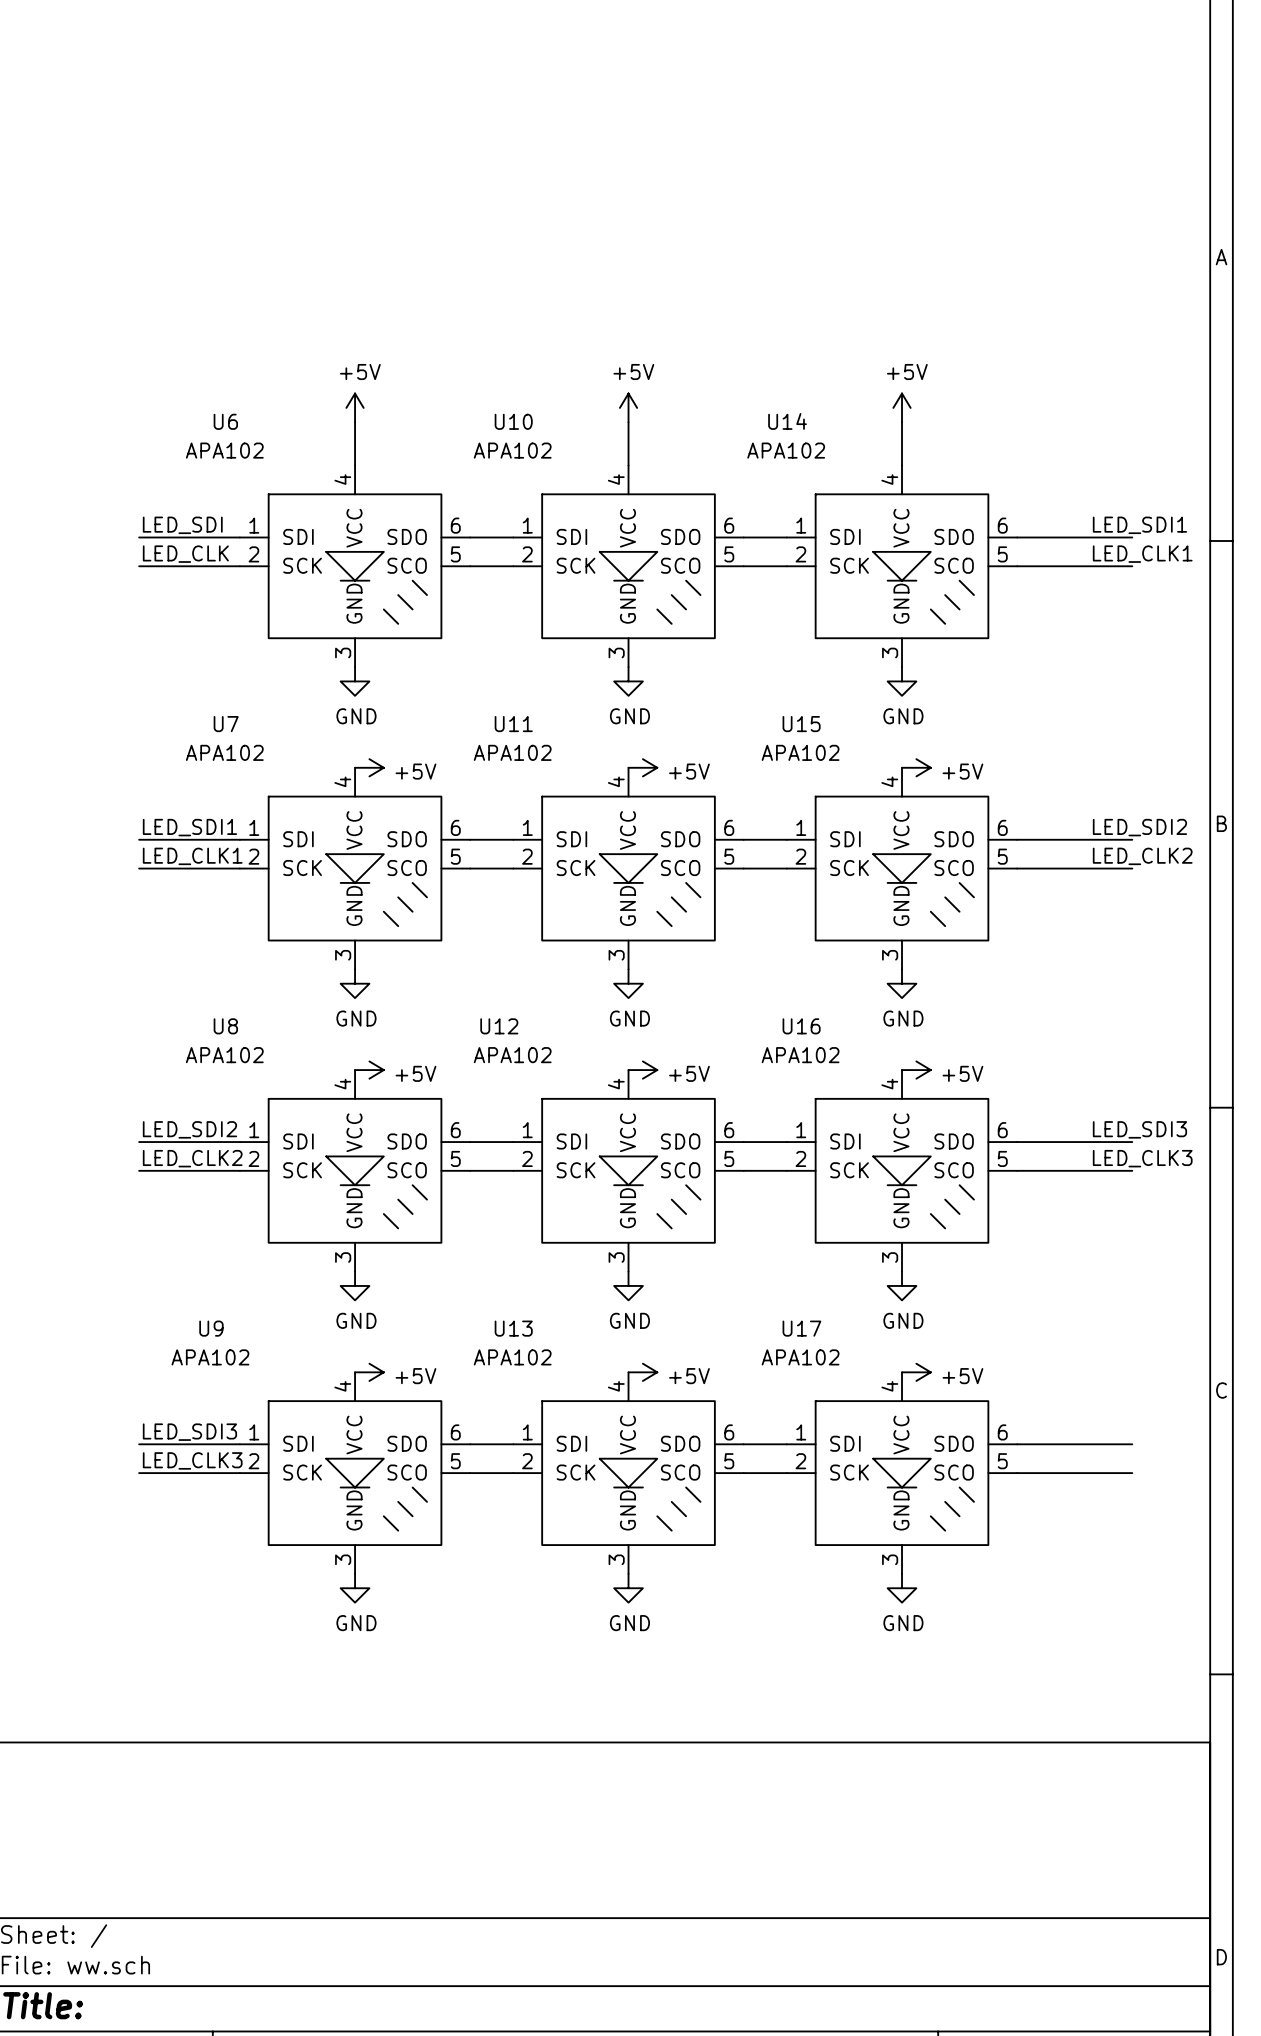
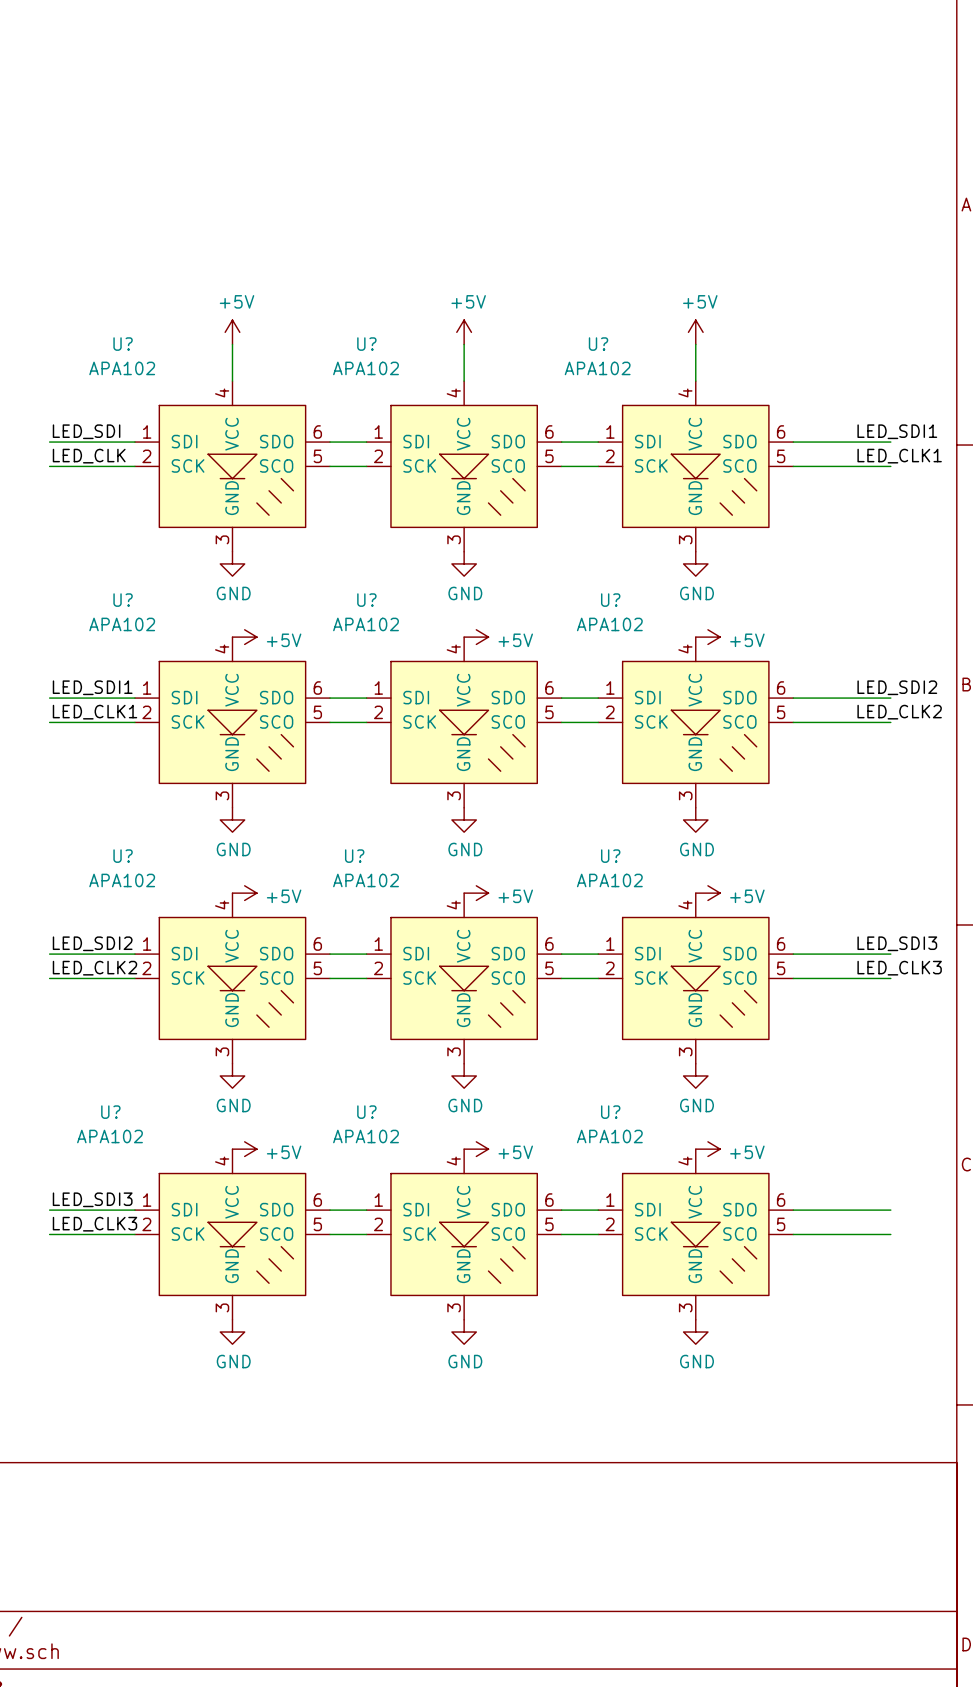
U6 name: U6 (225, 421) -> U? (123, 344)
U10 name: U10 (513, 421) -> U? (366, 344)
U14 name: U14 (787, 421) -> U? (598, 344)
U7 name: U7 (226, 724) -> U? (123, 600)
U11 name: U11 (513, 724) -> U? (366, 600)
U15 name: U15 (801, 724) -> U? (610, 600)
U8 name: U8 (225, 1026) -> U? (123, 856)
U12 name: U12 (499, 1026) -> U? (354, 856)
U16 name: U16 (801, 1026) -> U? (610, 856)
U9 name: U9 (211, 1328) -> U? (110, 1112)
U13 name: U13 (513, 1328) -> U? (366, 1112)
U17 name: U17 (801, 1328) -> U? (610, 1112)

